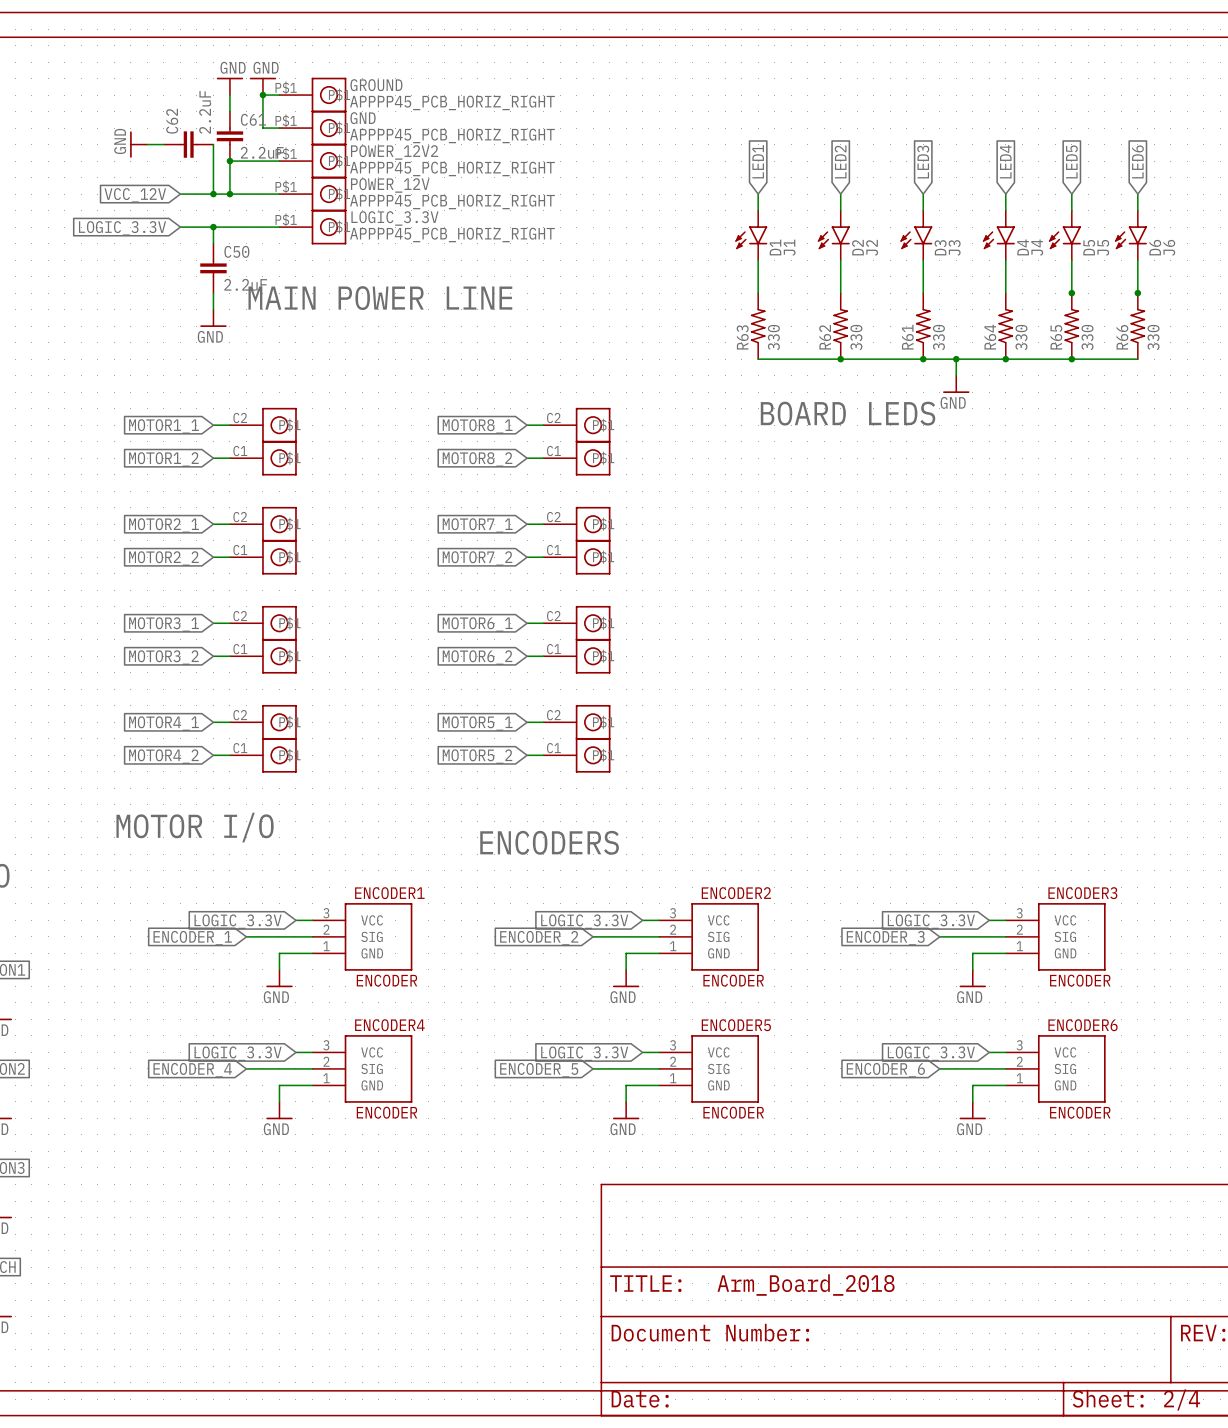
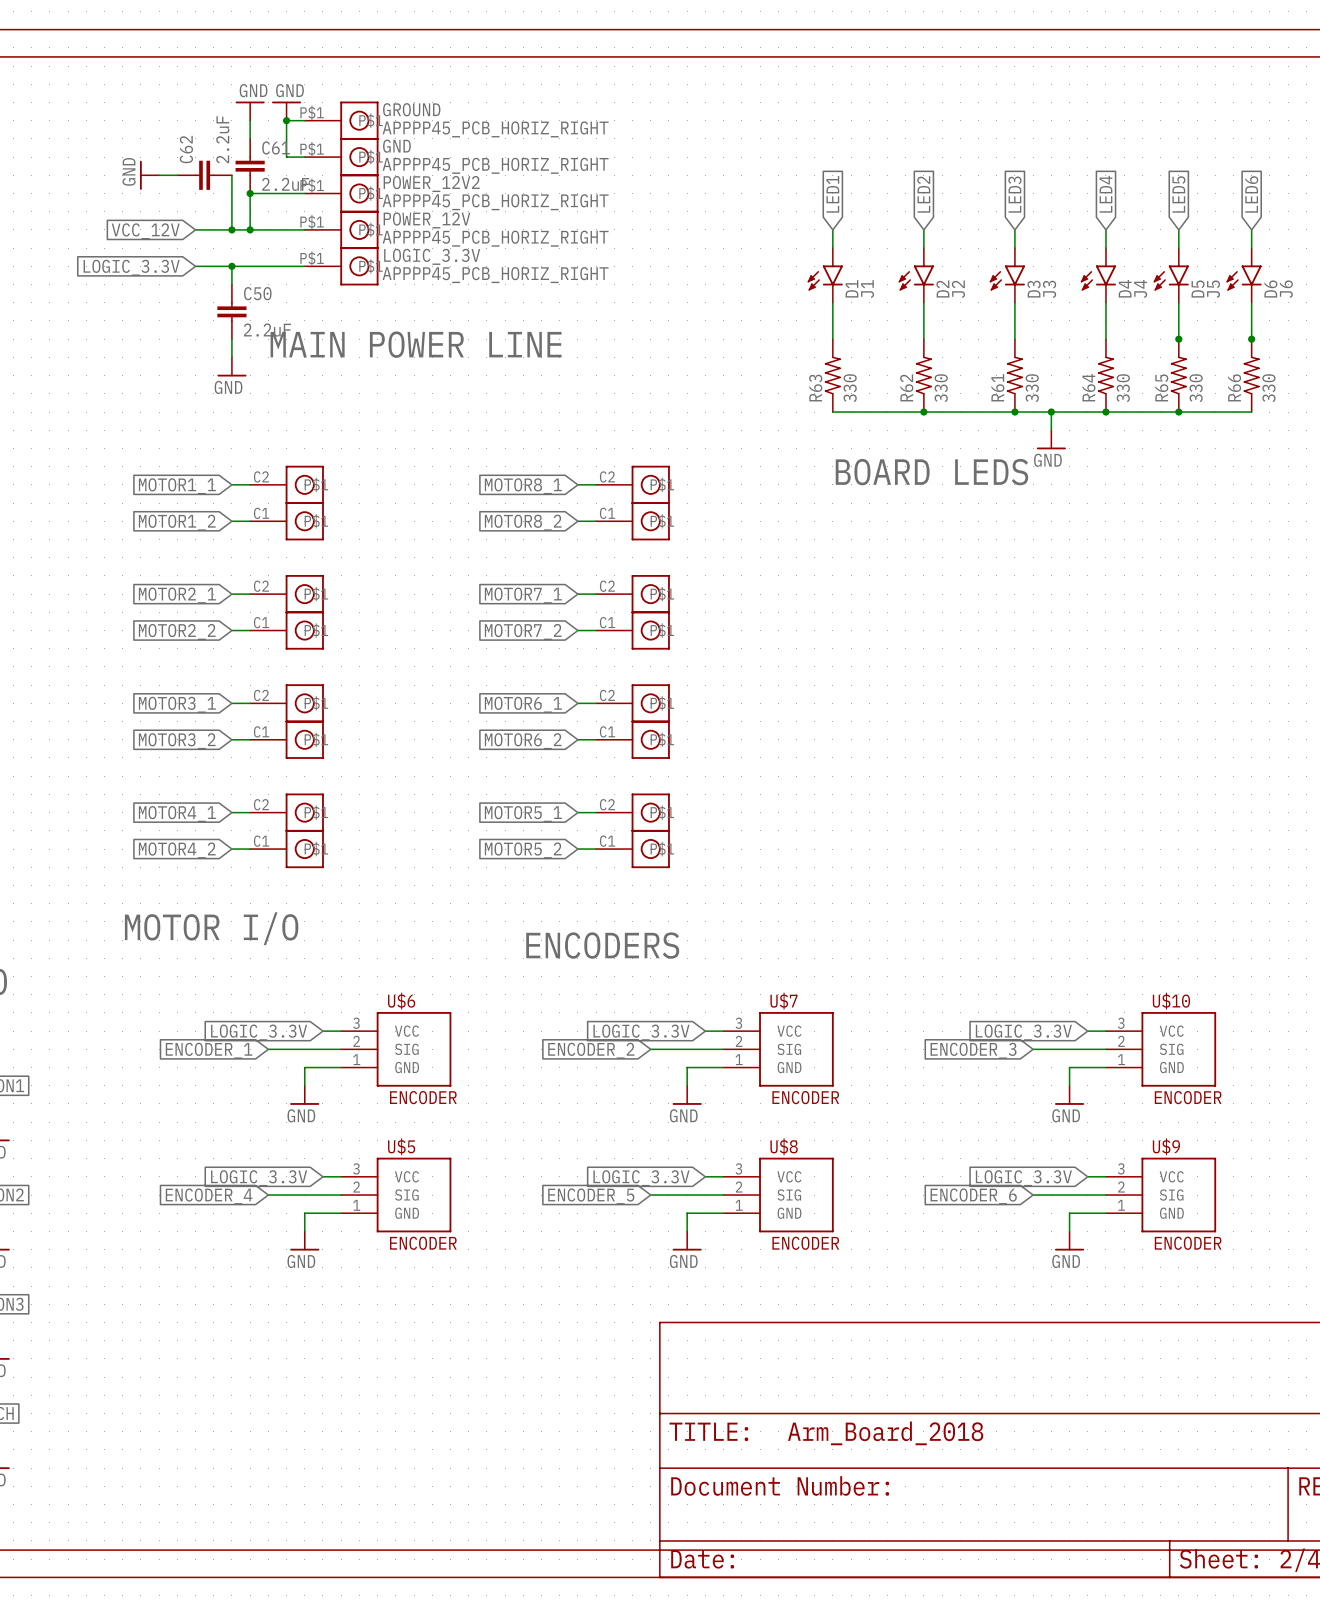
ENCODER1 name: ENCODER1 (389, 893) -> U$6 (401, 1001)
ENCODER2 name: ENCODER2 (736, 893) -> U$7 (783, 1001)
ENCODER3 name: ENCODER3 (1082, 893) -> U$10 (1171, 1001)
ENCODER4 name: ENCODER4 (389, 1025) -> U$5 (401, 1146)
ENCODER5 name: ENCODER5 (736, 1025) -> U$8 (784, 1146)
ENCODER6 name: ENCODER6 (1083, 1025) -> U$9 (1166, 1146)

